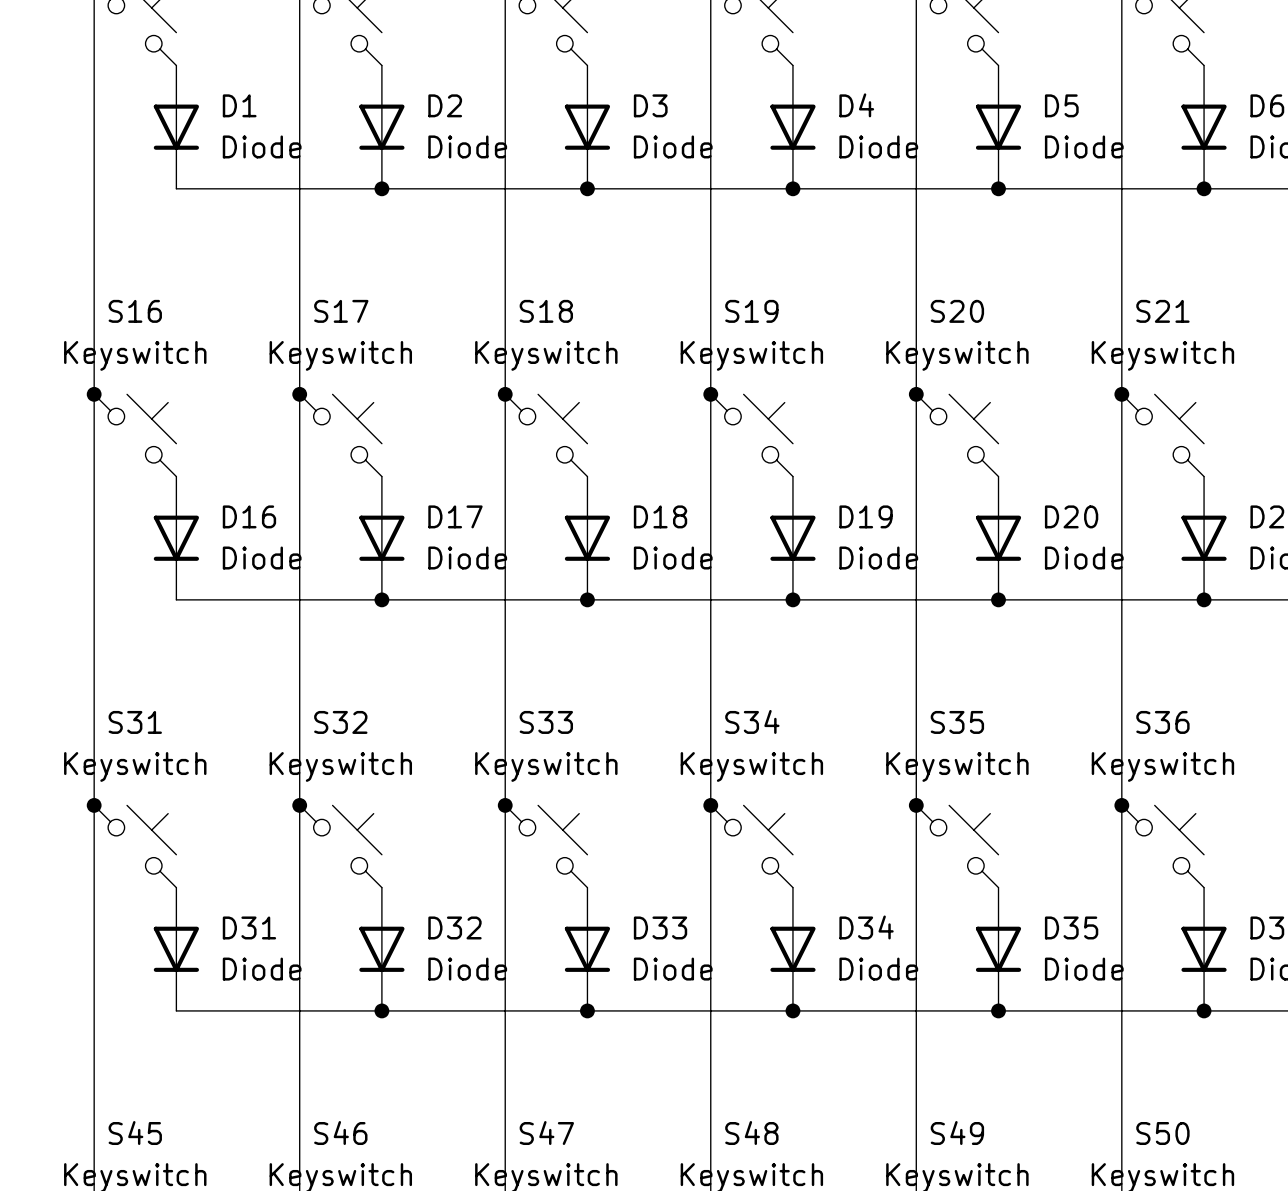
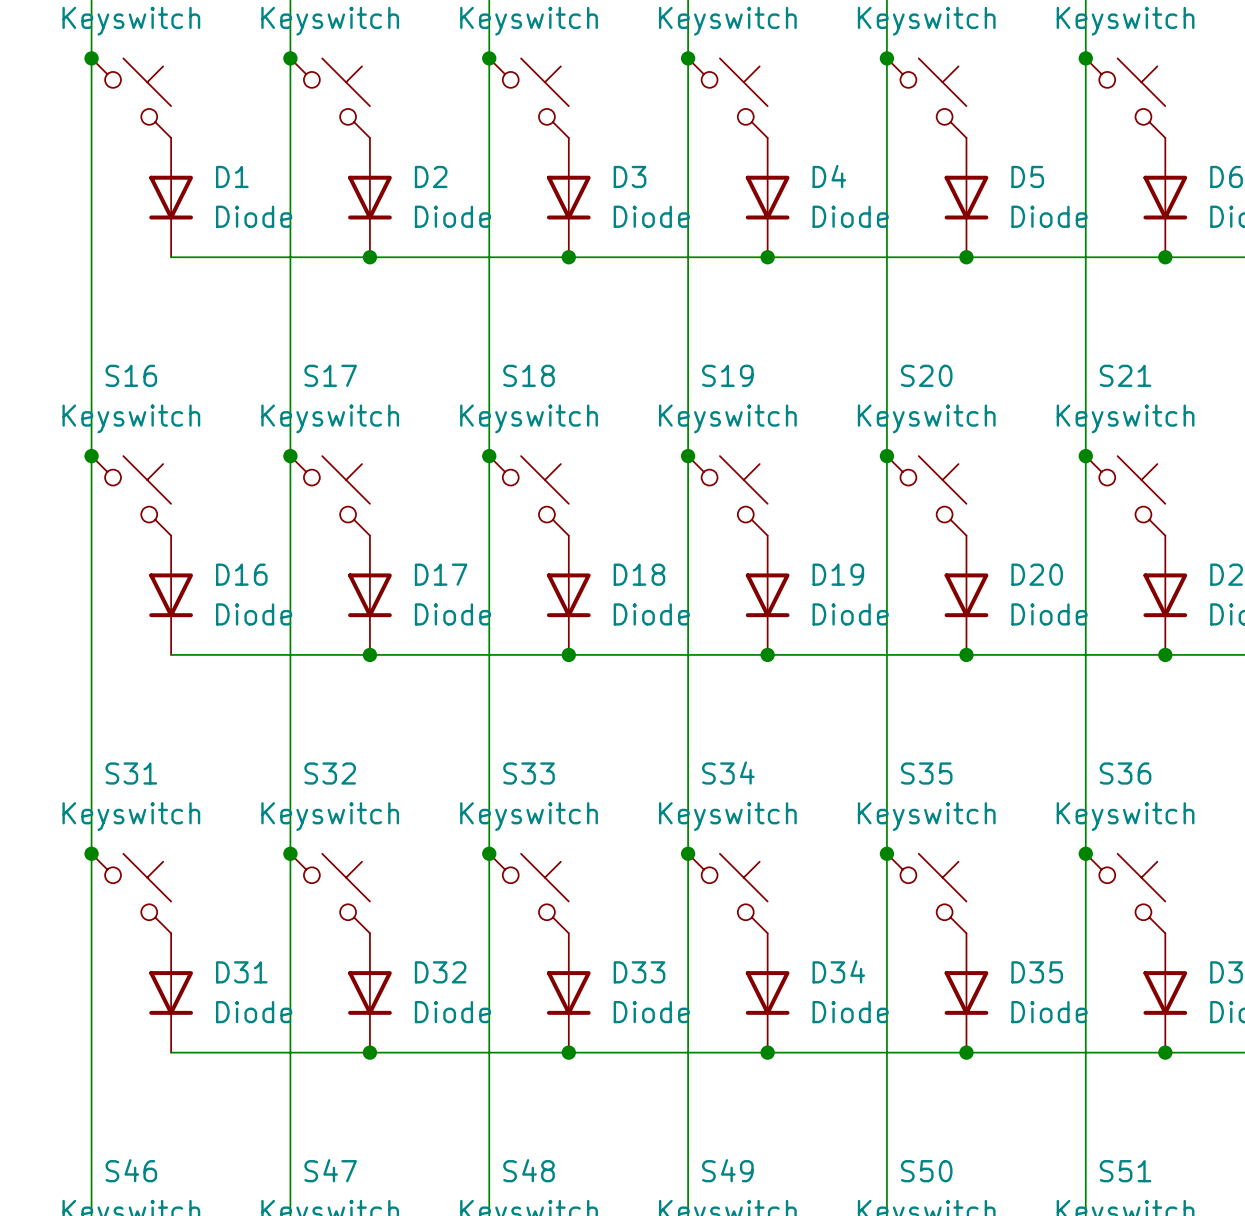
S45 name: S45 (135, 1133) -> S46 (131, 1170)
S46 name: S46 (340, 1133) -> S47 (330, 1170)
S47 name: S47 (546, 1133) -> S48 (529, 1170)
S48 name: S48 (751, 1133) -> S49 (727, 1170)
S49 name: S49 (957, 1133) -> S50 (926, 1171)
S50 name: S50 (1162, 1133) -> S51 (1125, 1171)

